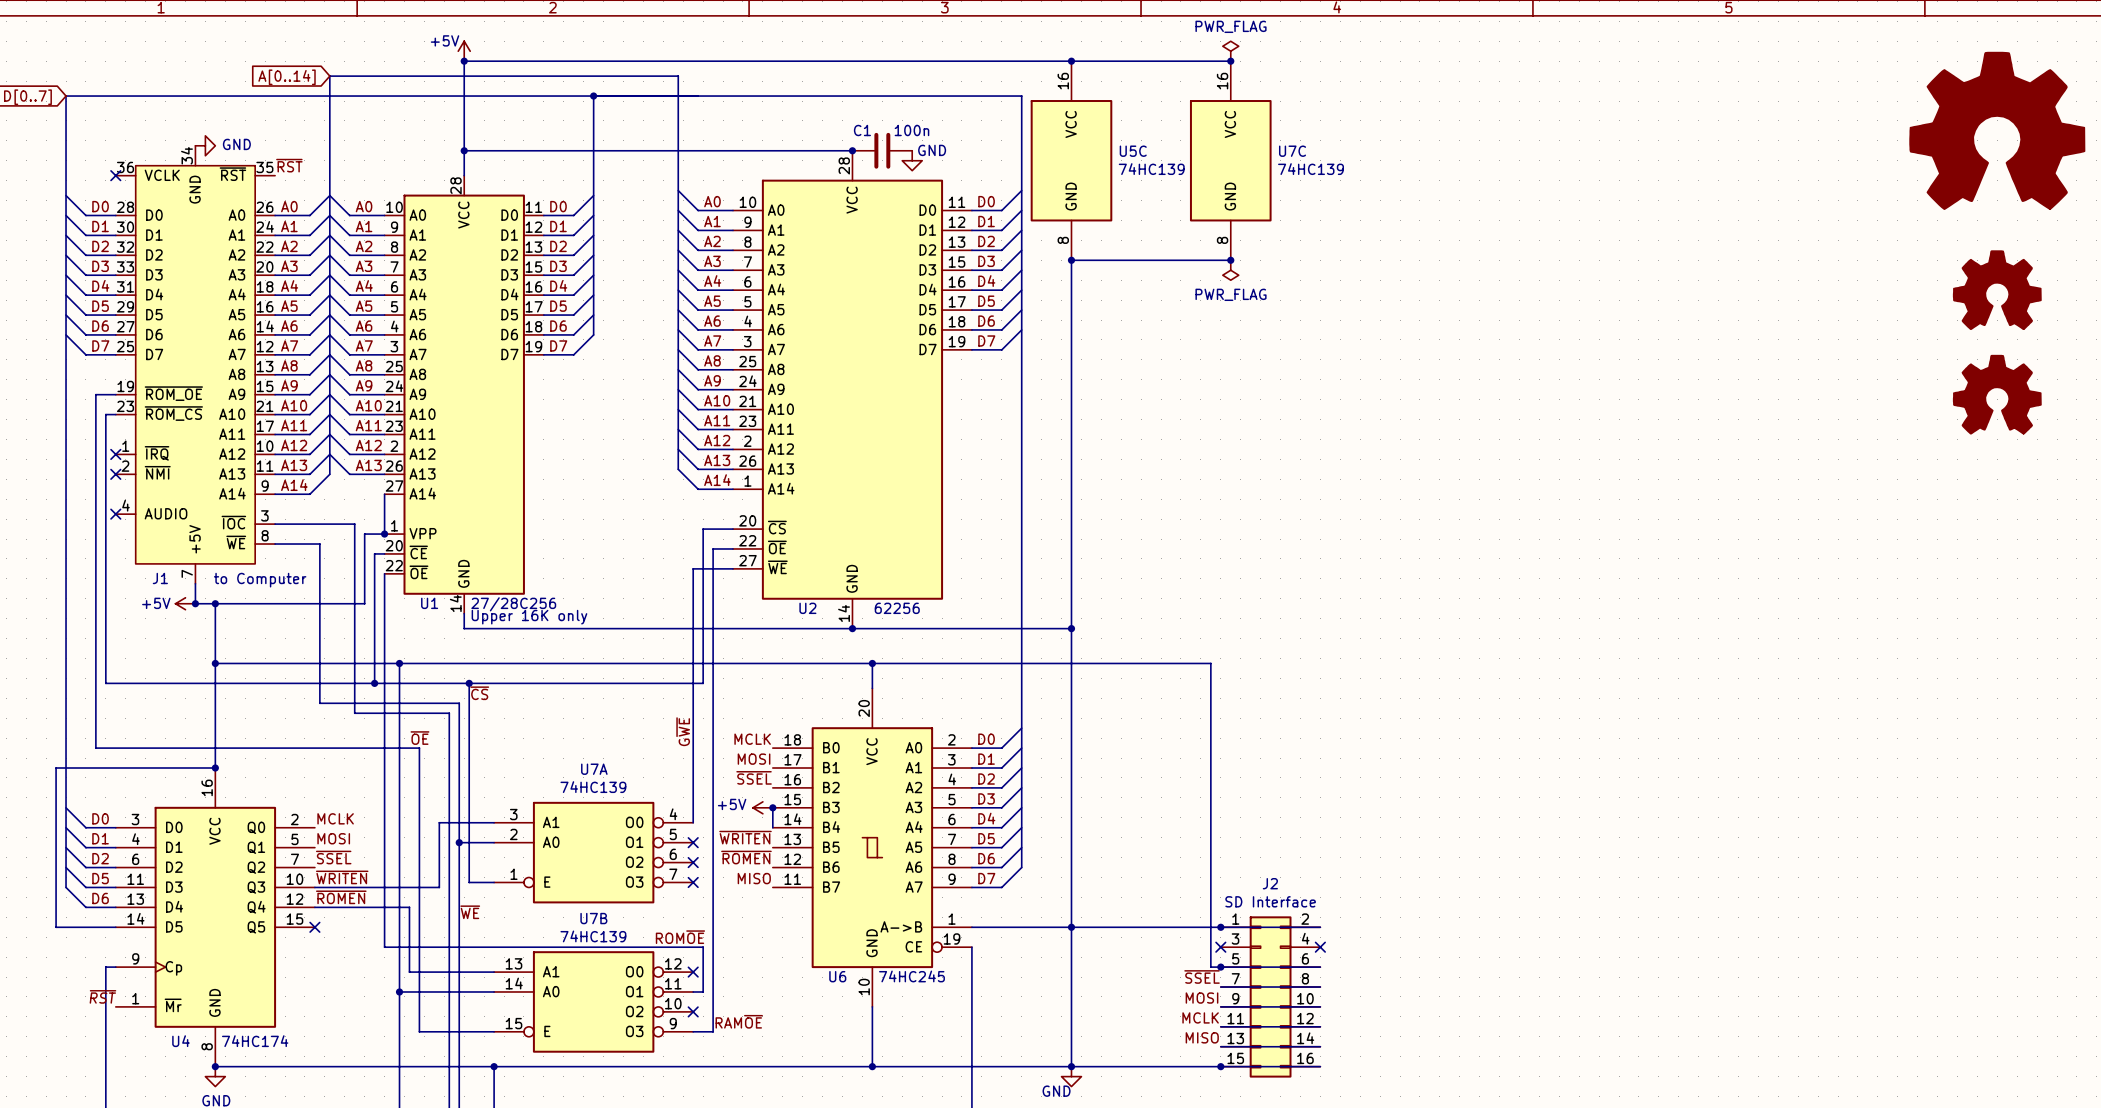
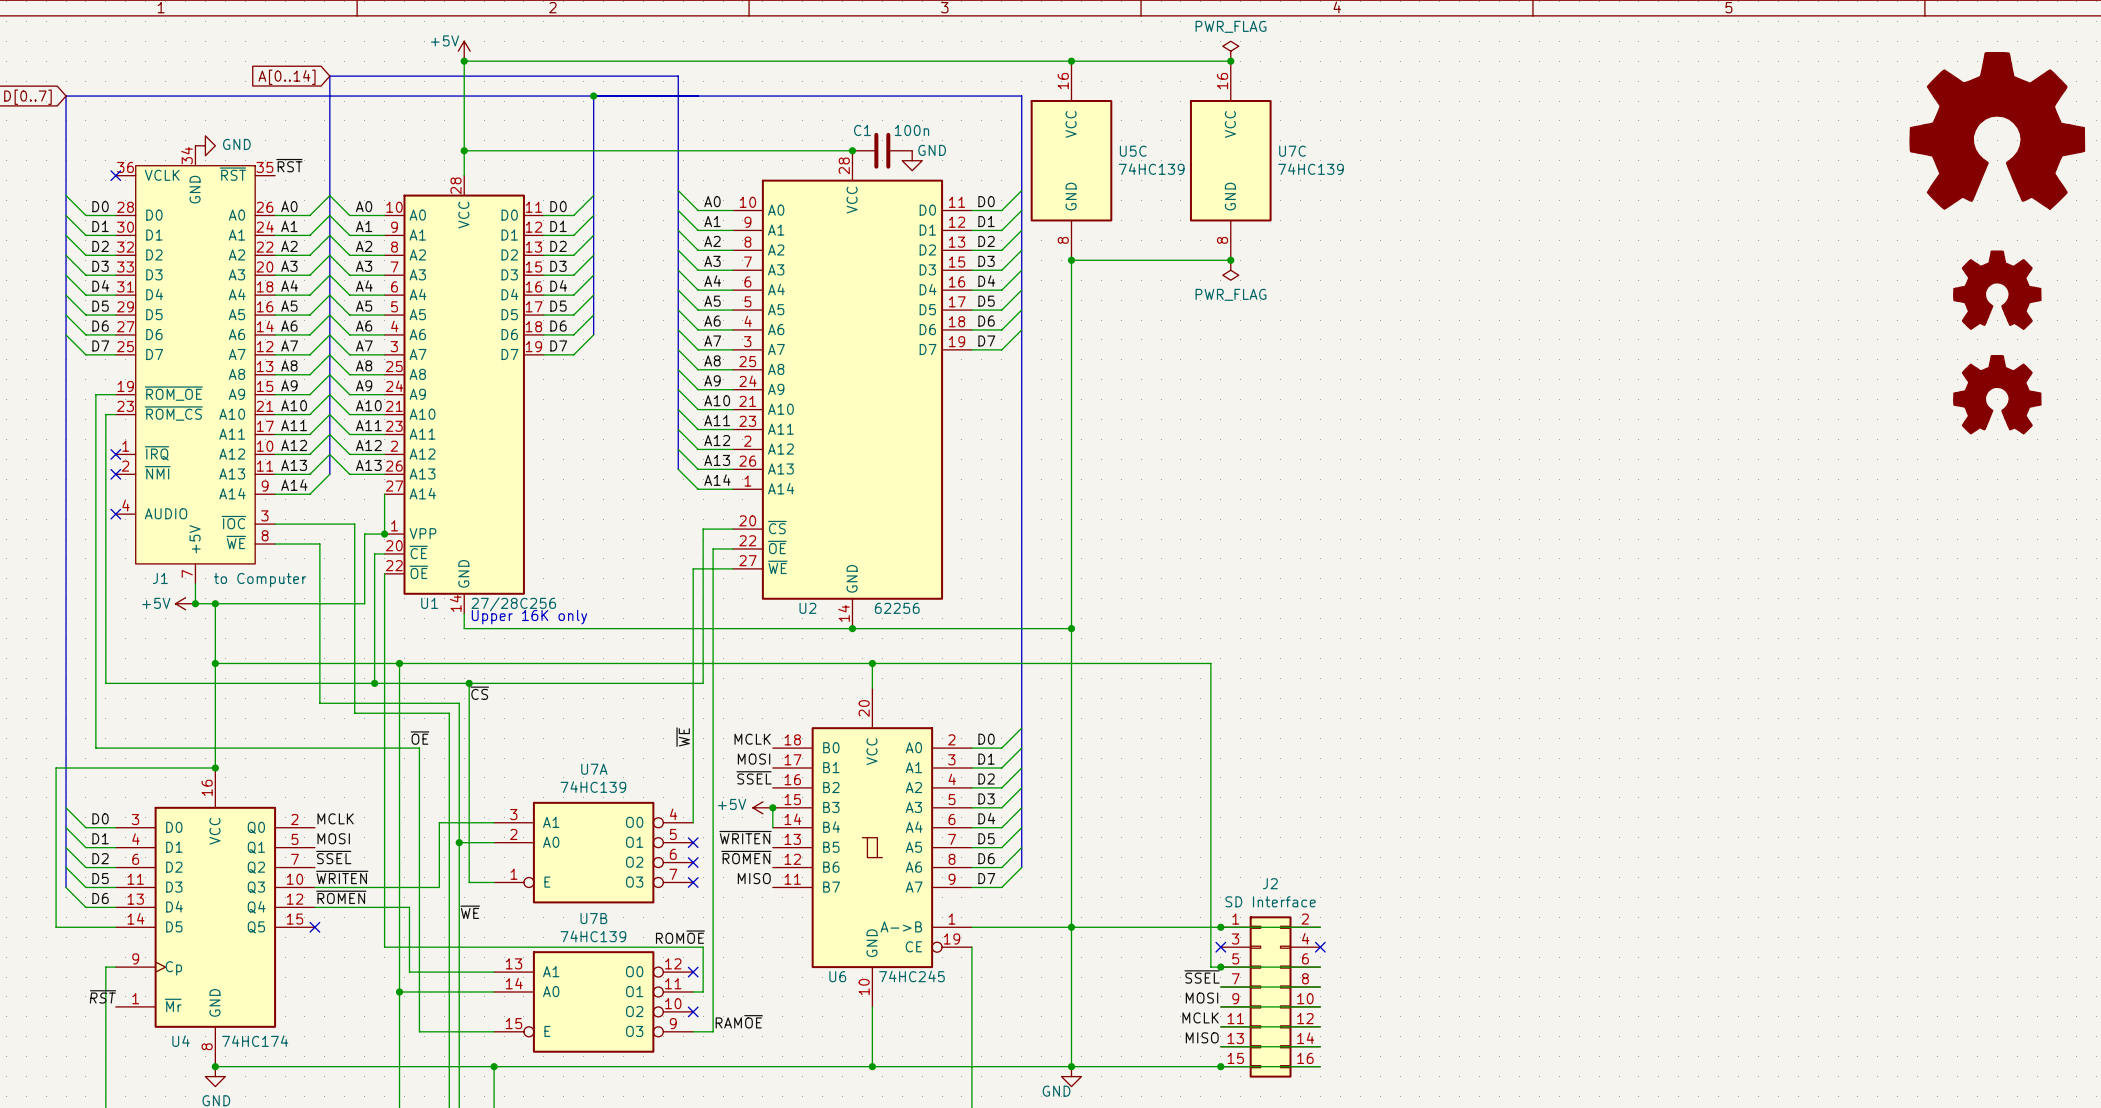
label: G~{WE} (683, 731) -> ~{WE} (683, 737)

